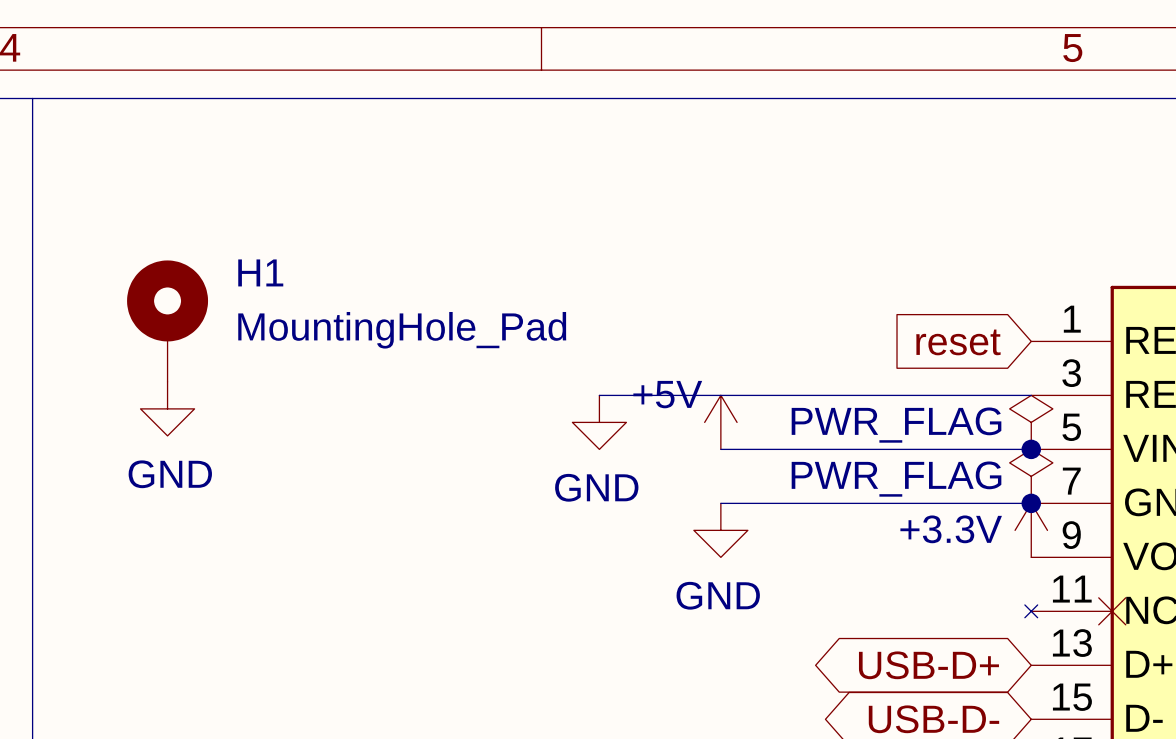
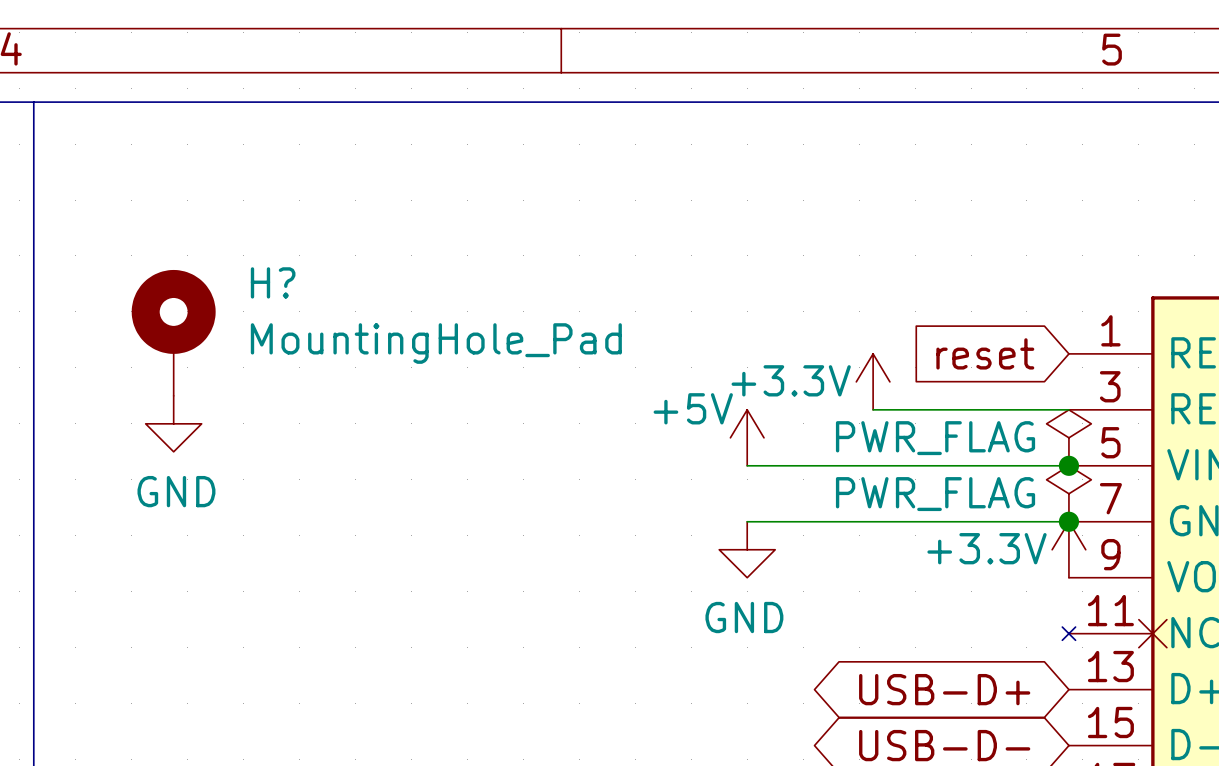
H1 name: H1 (260, 272) -> H? (273, 282)
power symbol: none -> +3.3V (873, 381)
wire: (599, 395) (842, 395) -> none
power symbol: GND (599, 422) -> none

